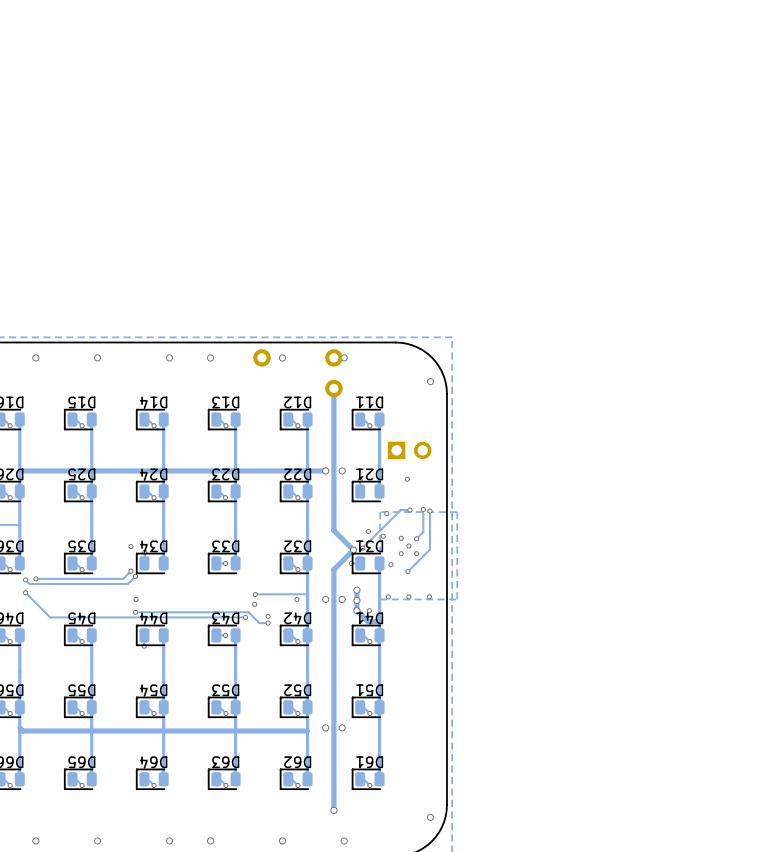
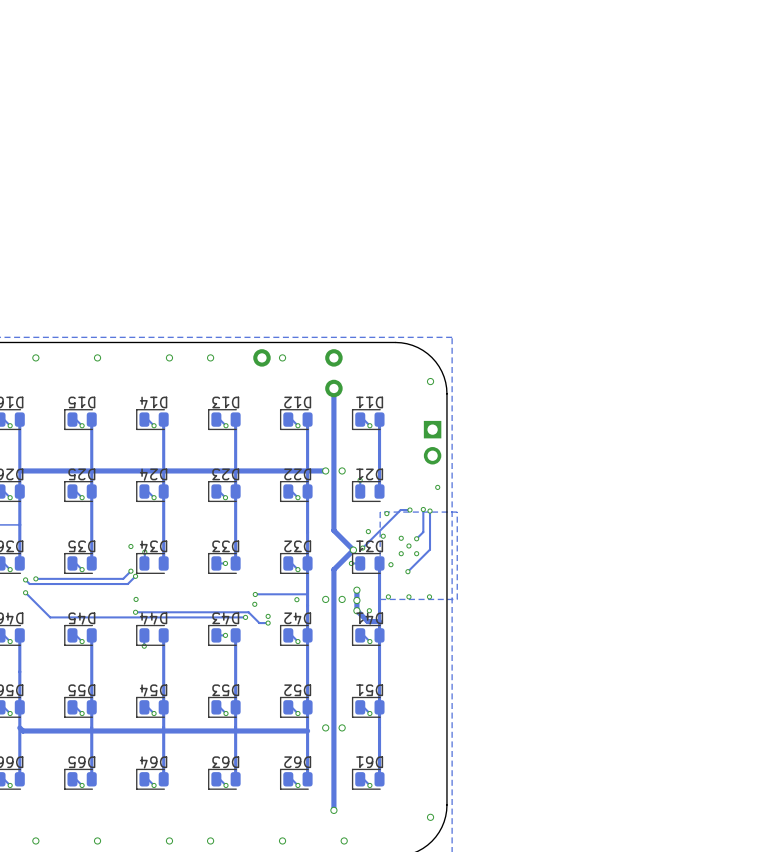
via: (344, 357) -> none
part rotation: 0° (409, 450) -> 90° clockwise (432, 442)
via position: (407, 479) -> (437, 487)

